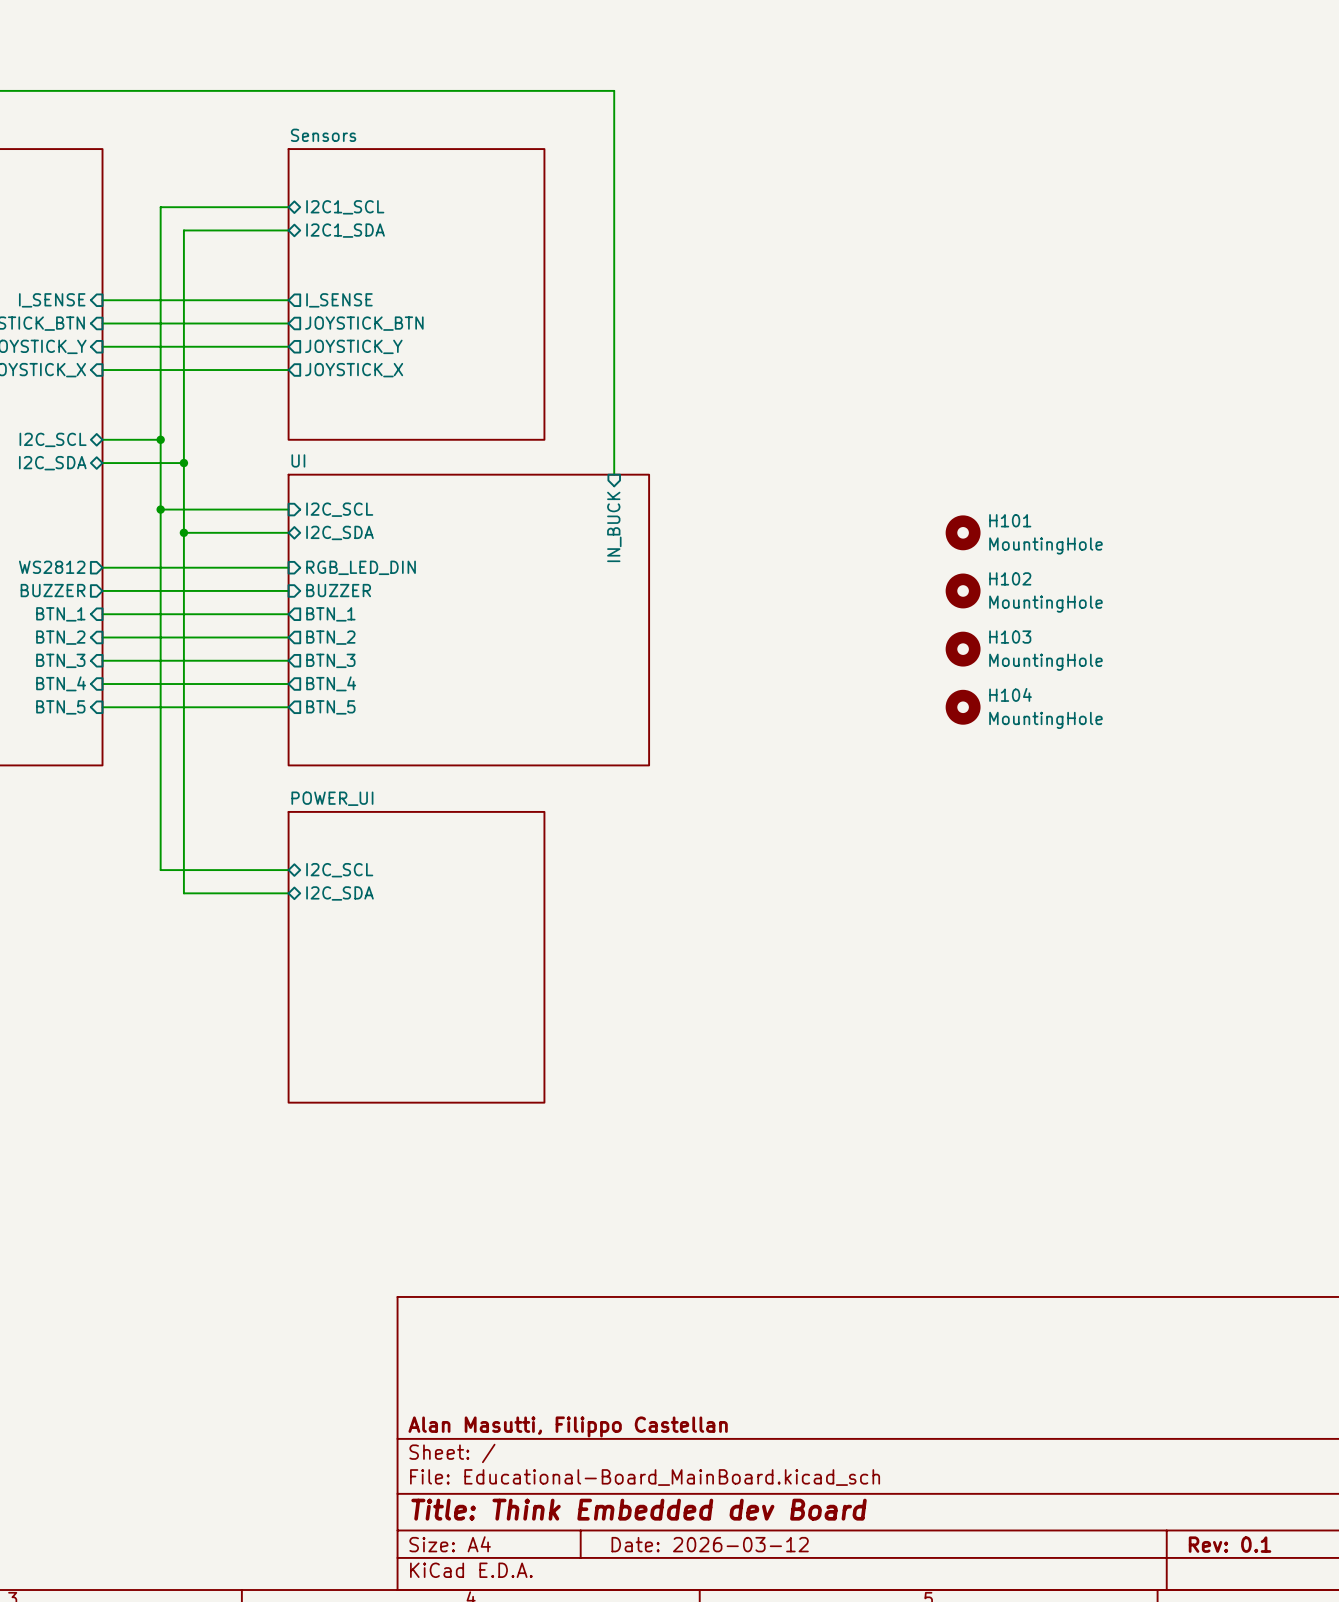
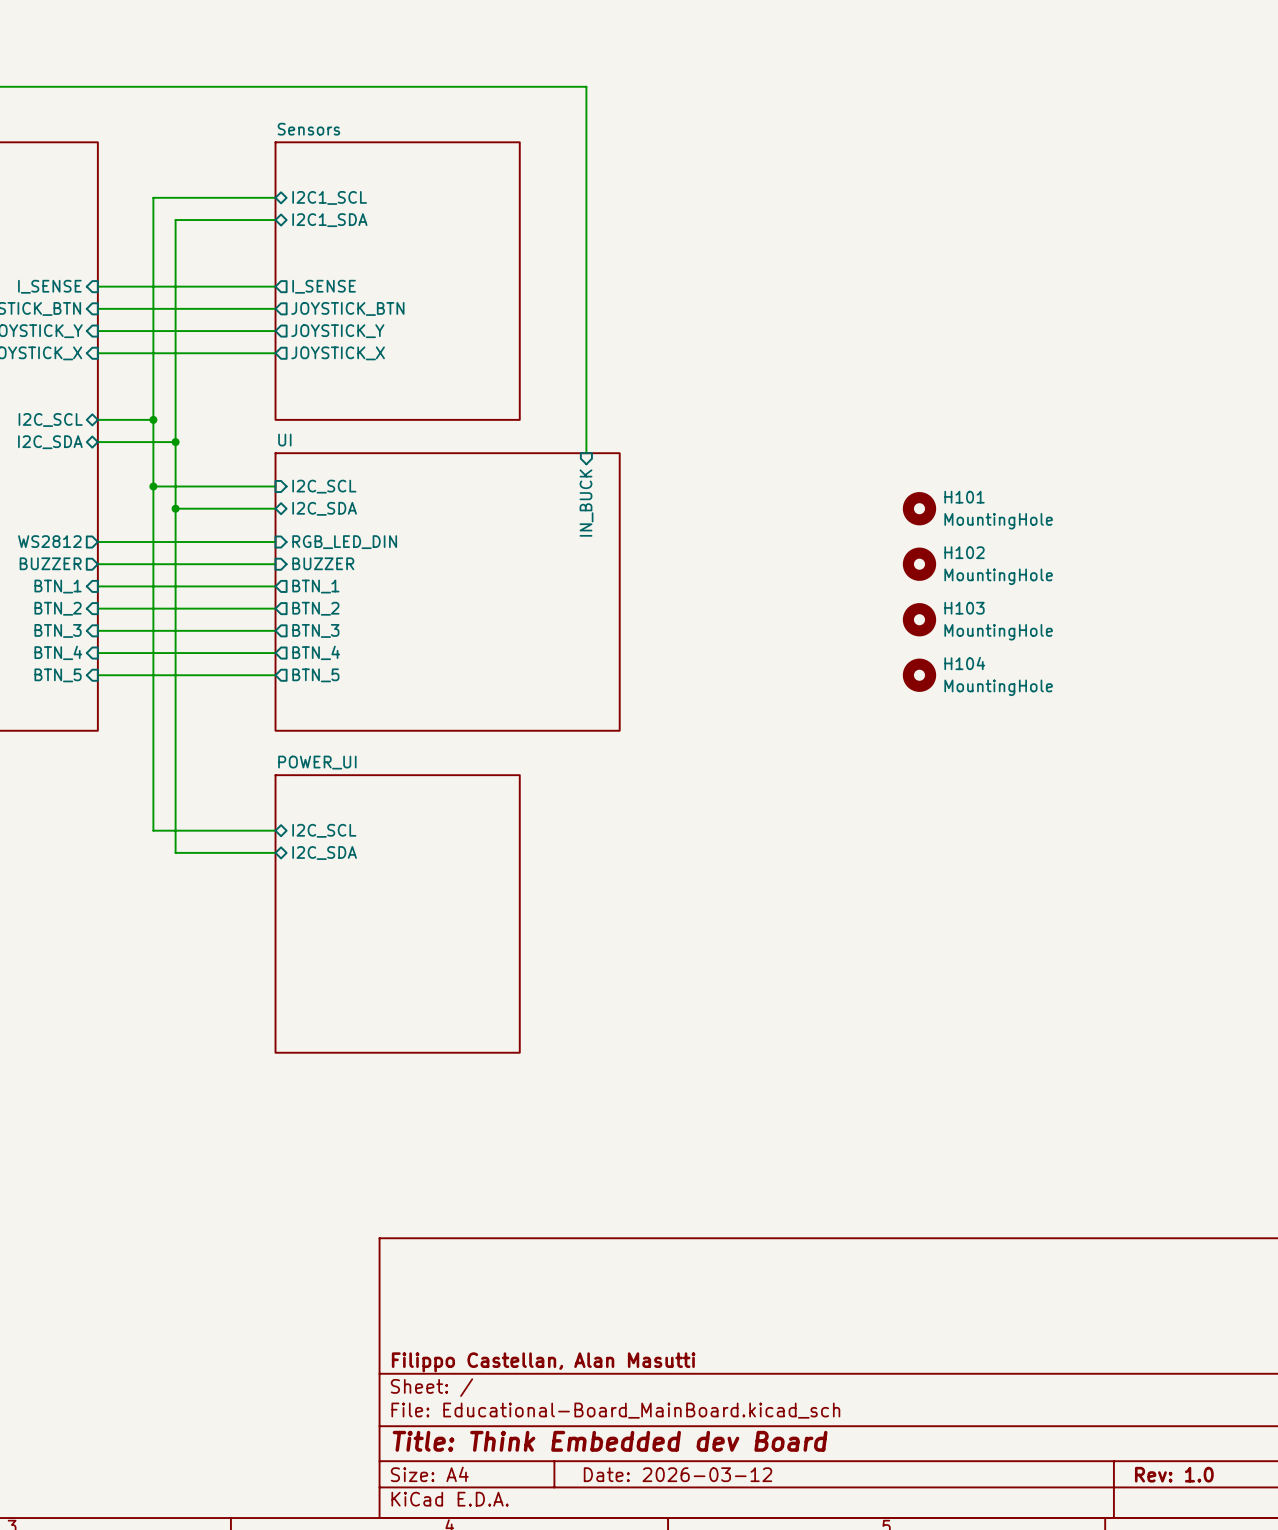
title block: Alan Masutti, Filippo Castellan (568, 1426) -> Filippo Castellan, Alan Masutti (543, 1362)
title block: Rev: 0.1 (1230, 1544) -> Rev: 1.0 (1174, 1474)

